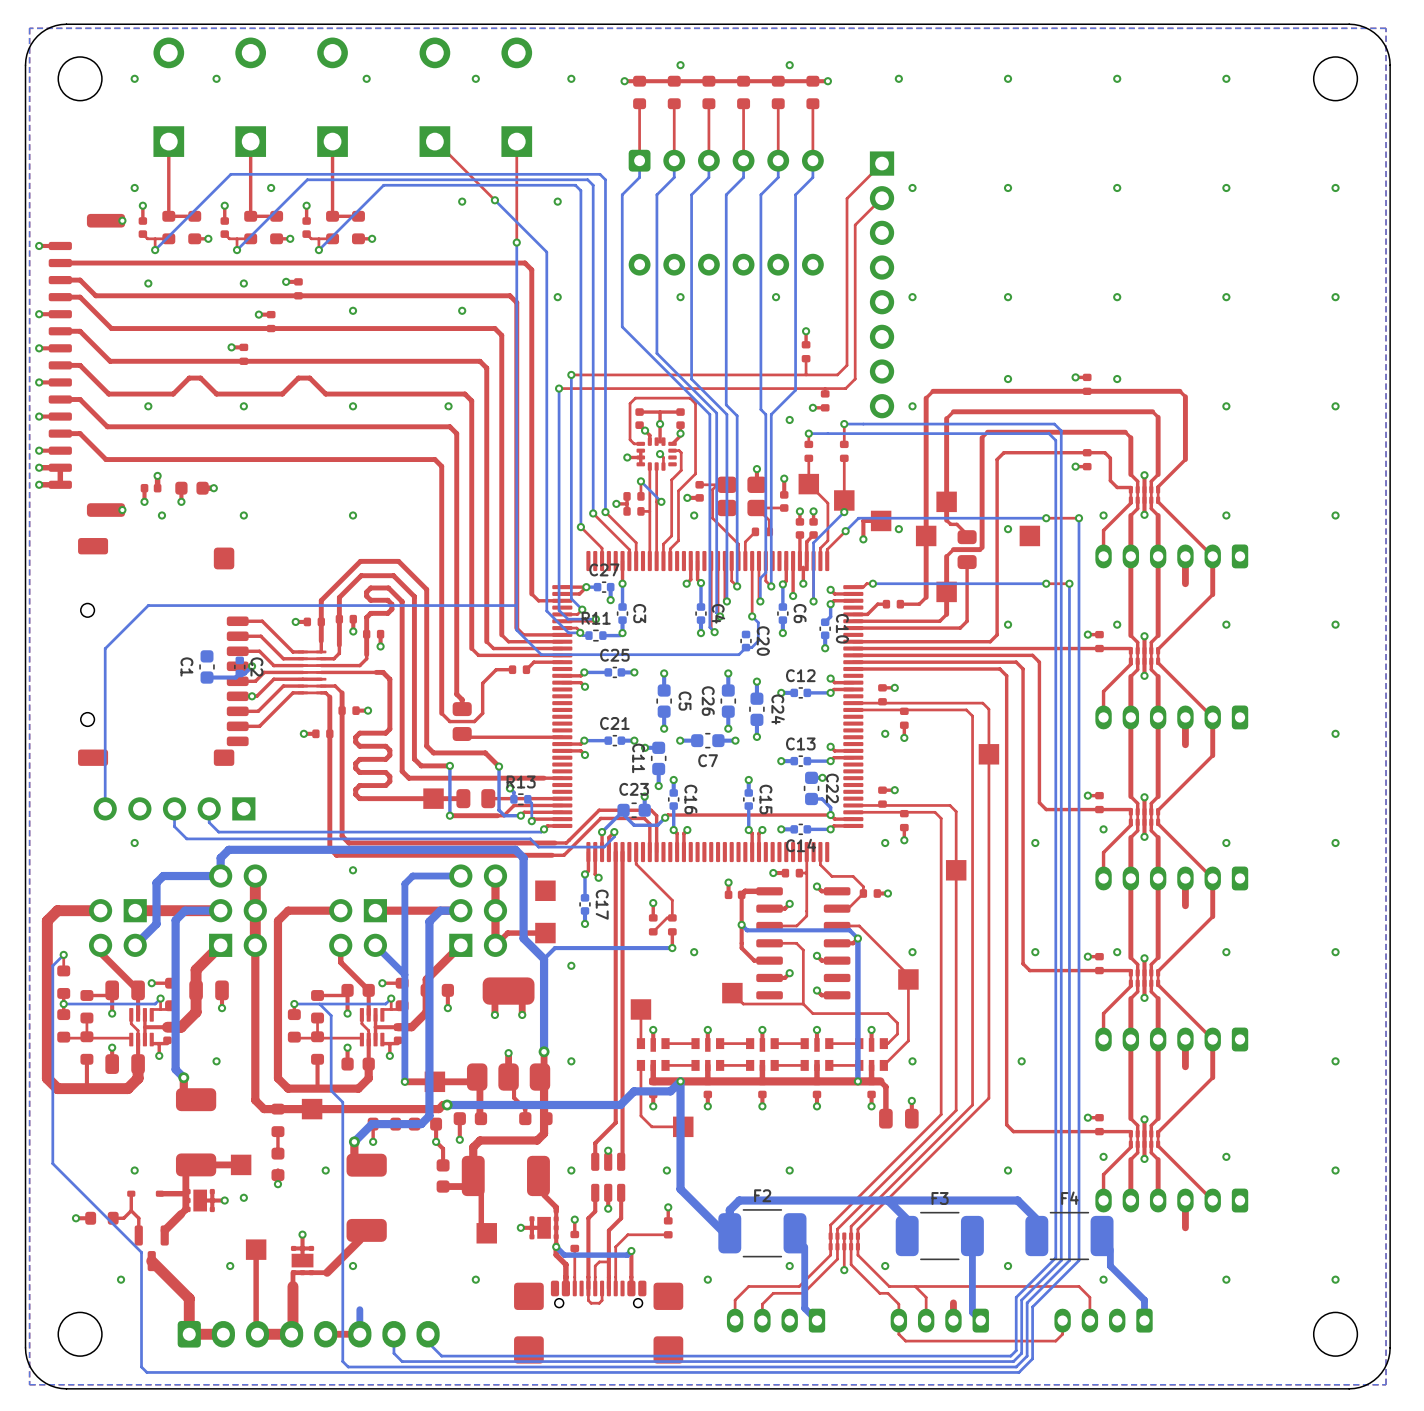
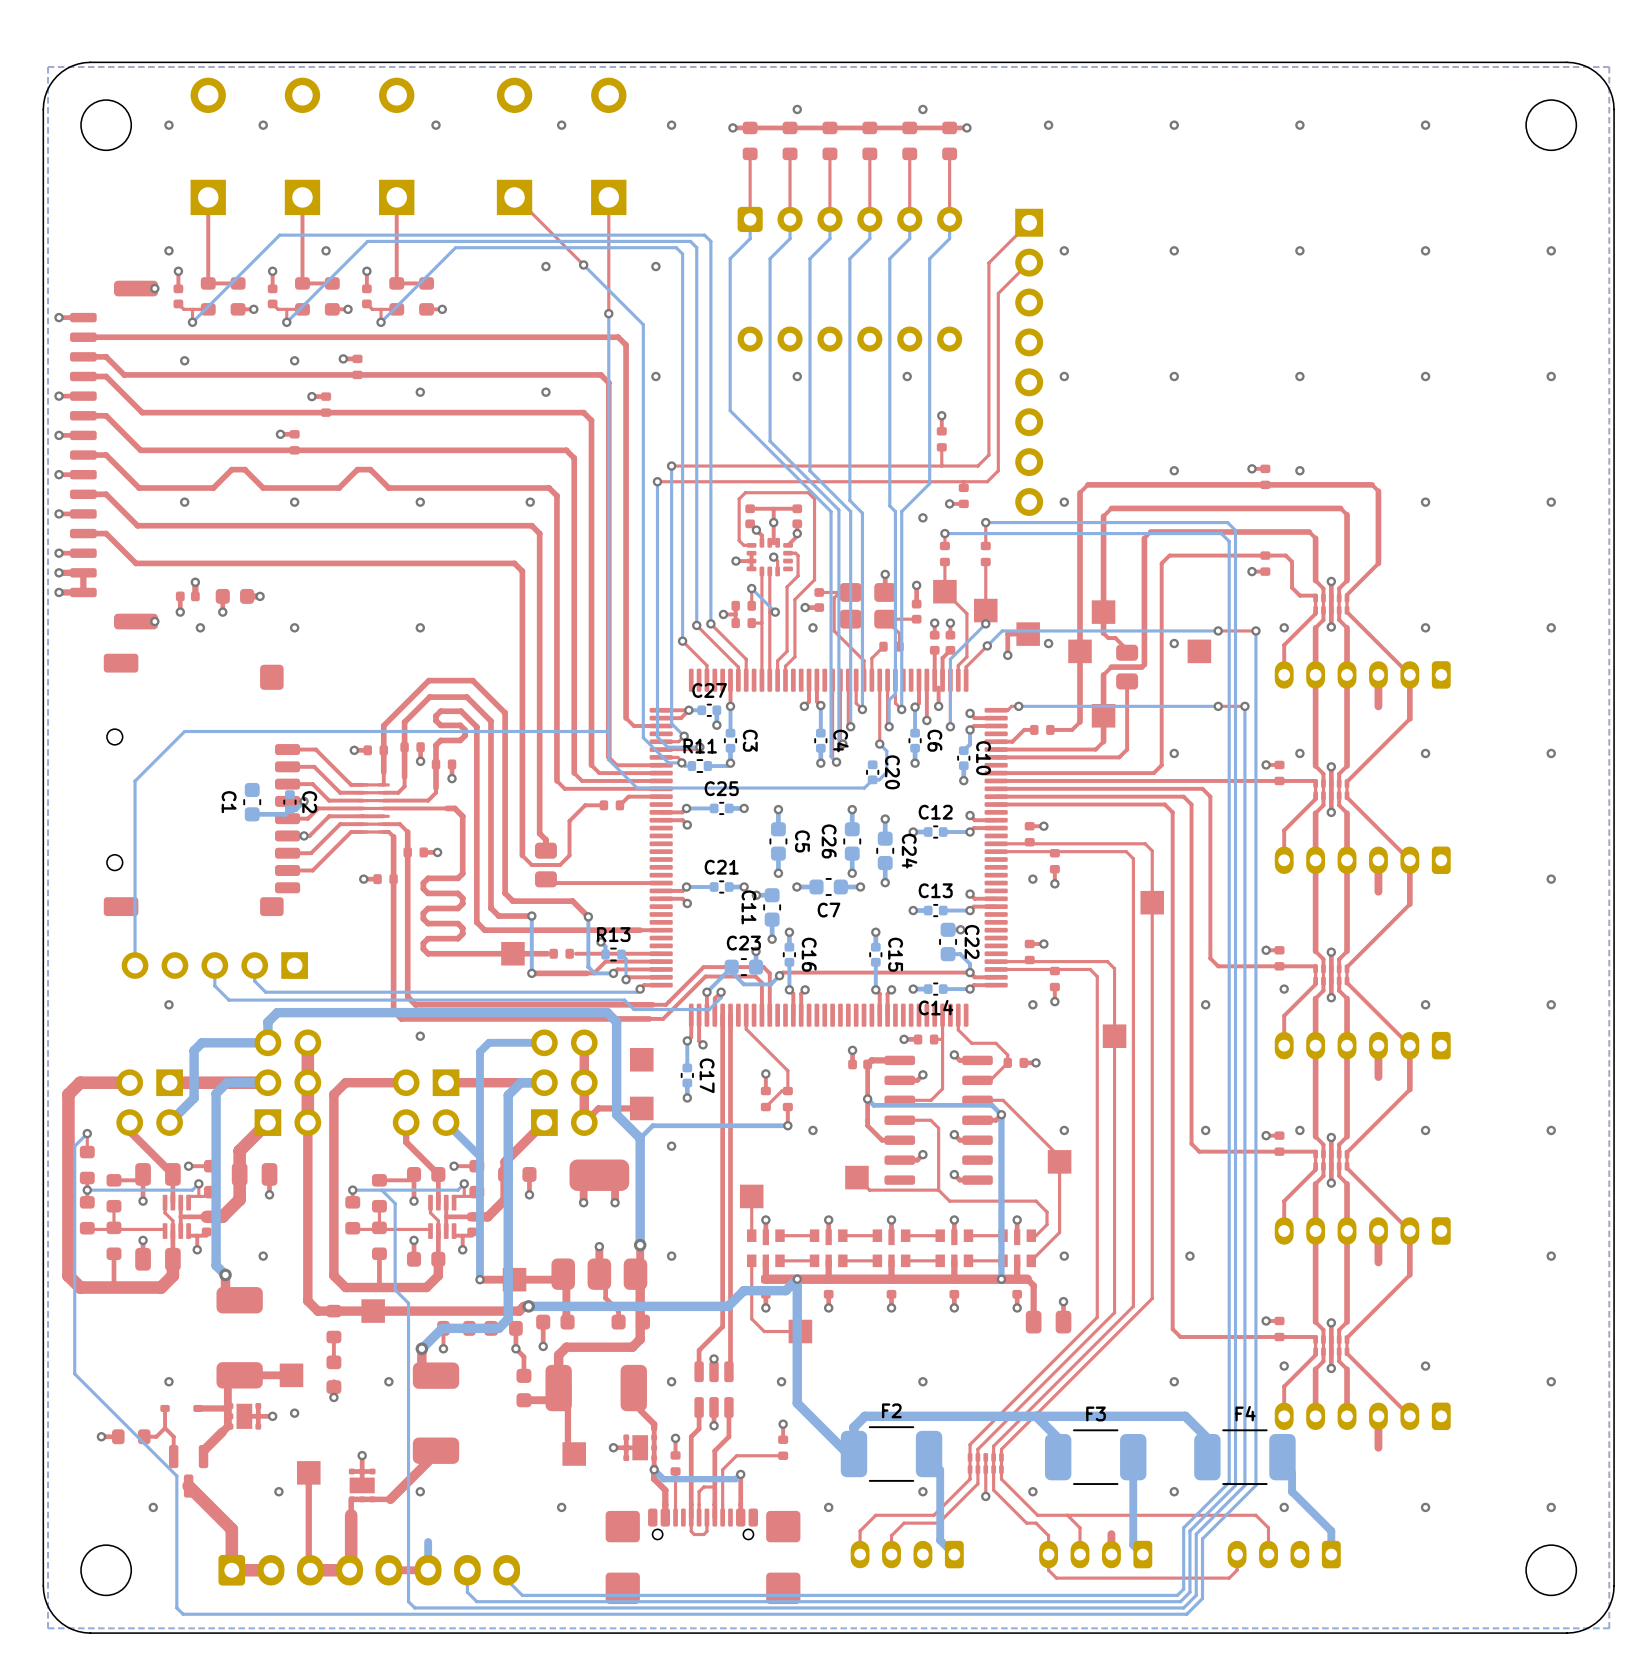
part footprint: [456, 789, 496, 809] -> [549, 948, 574, 959]

